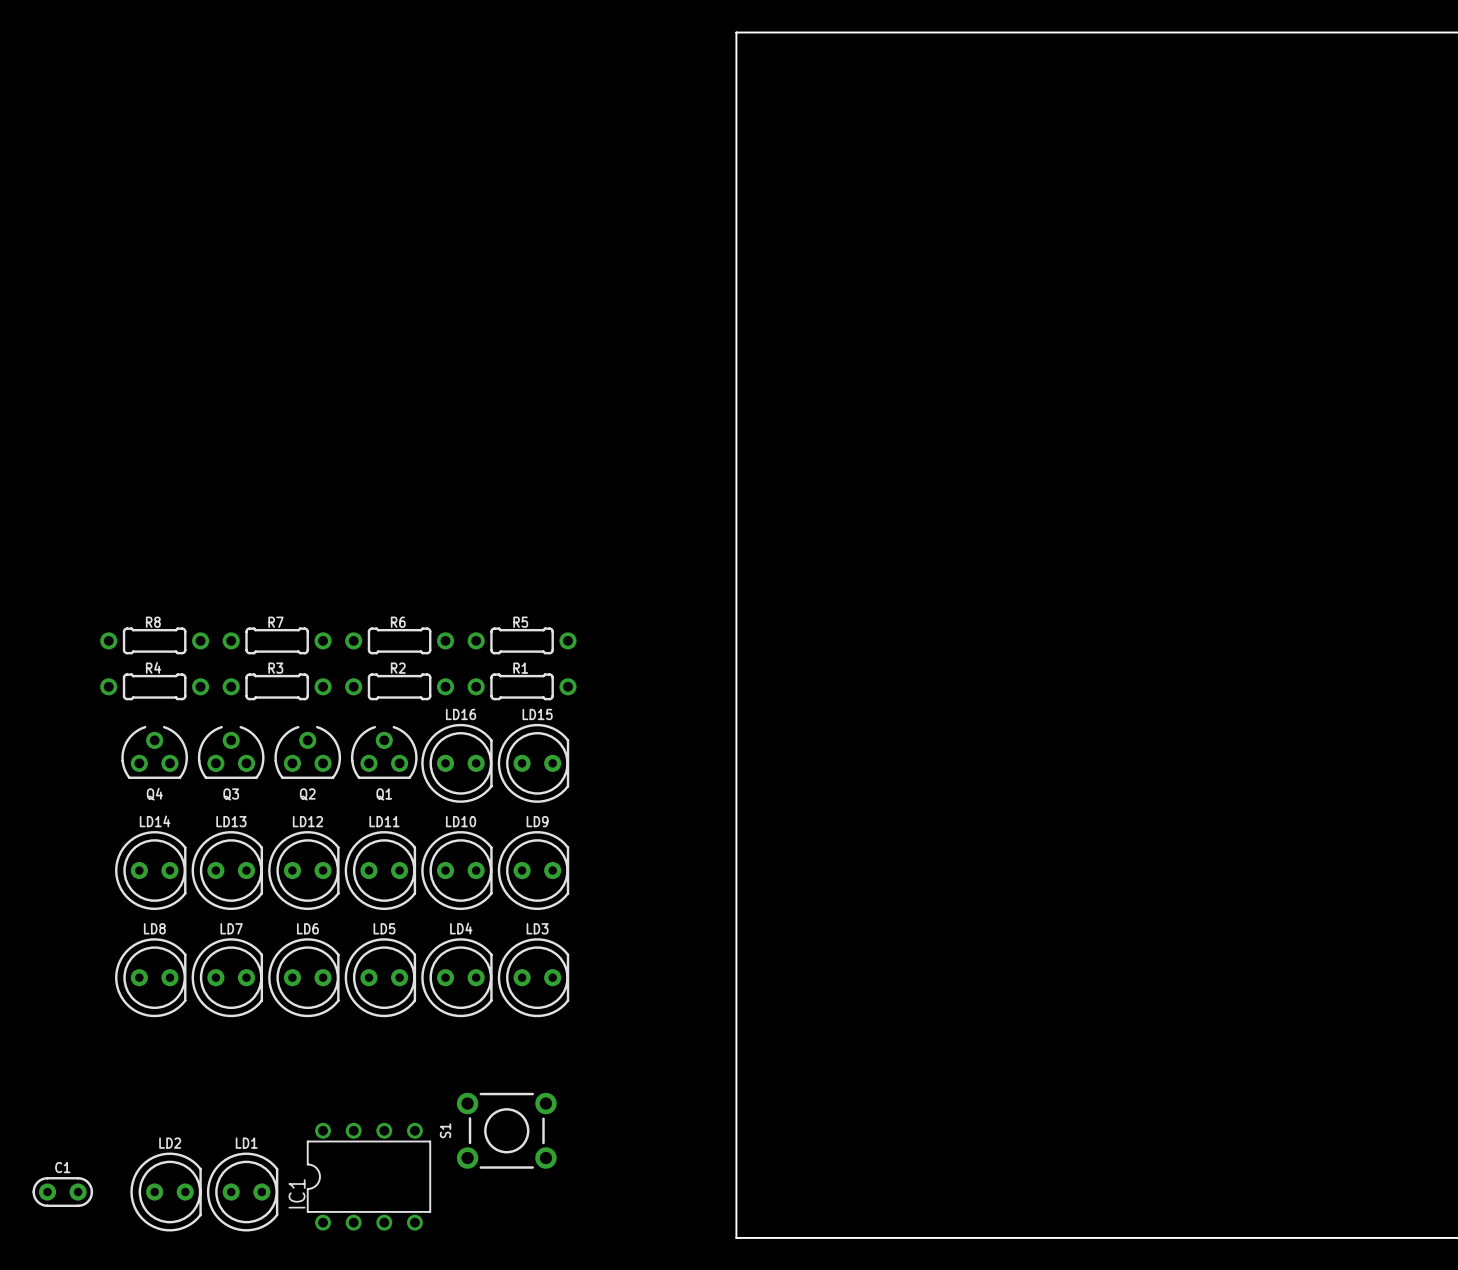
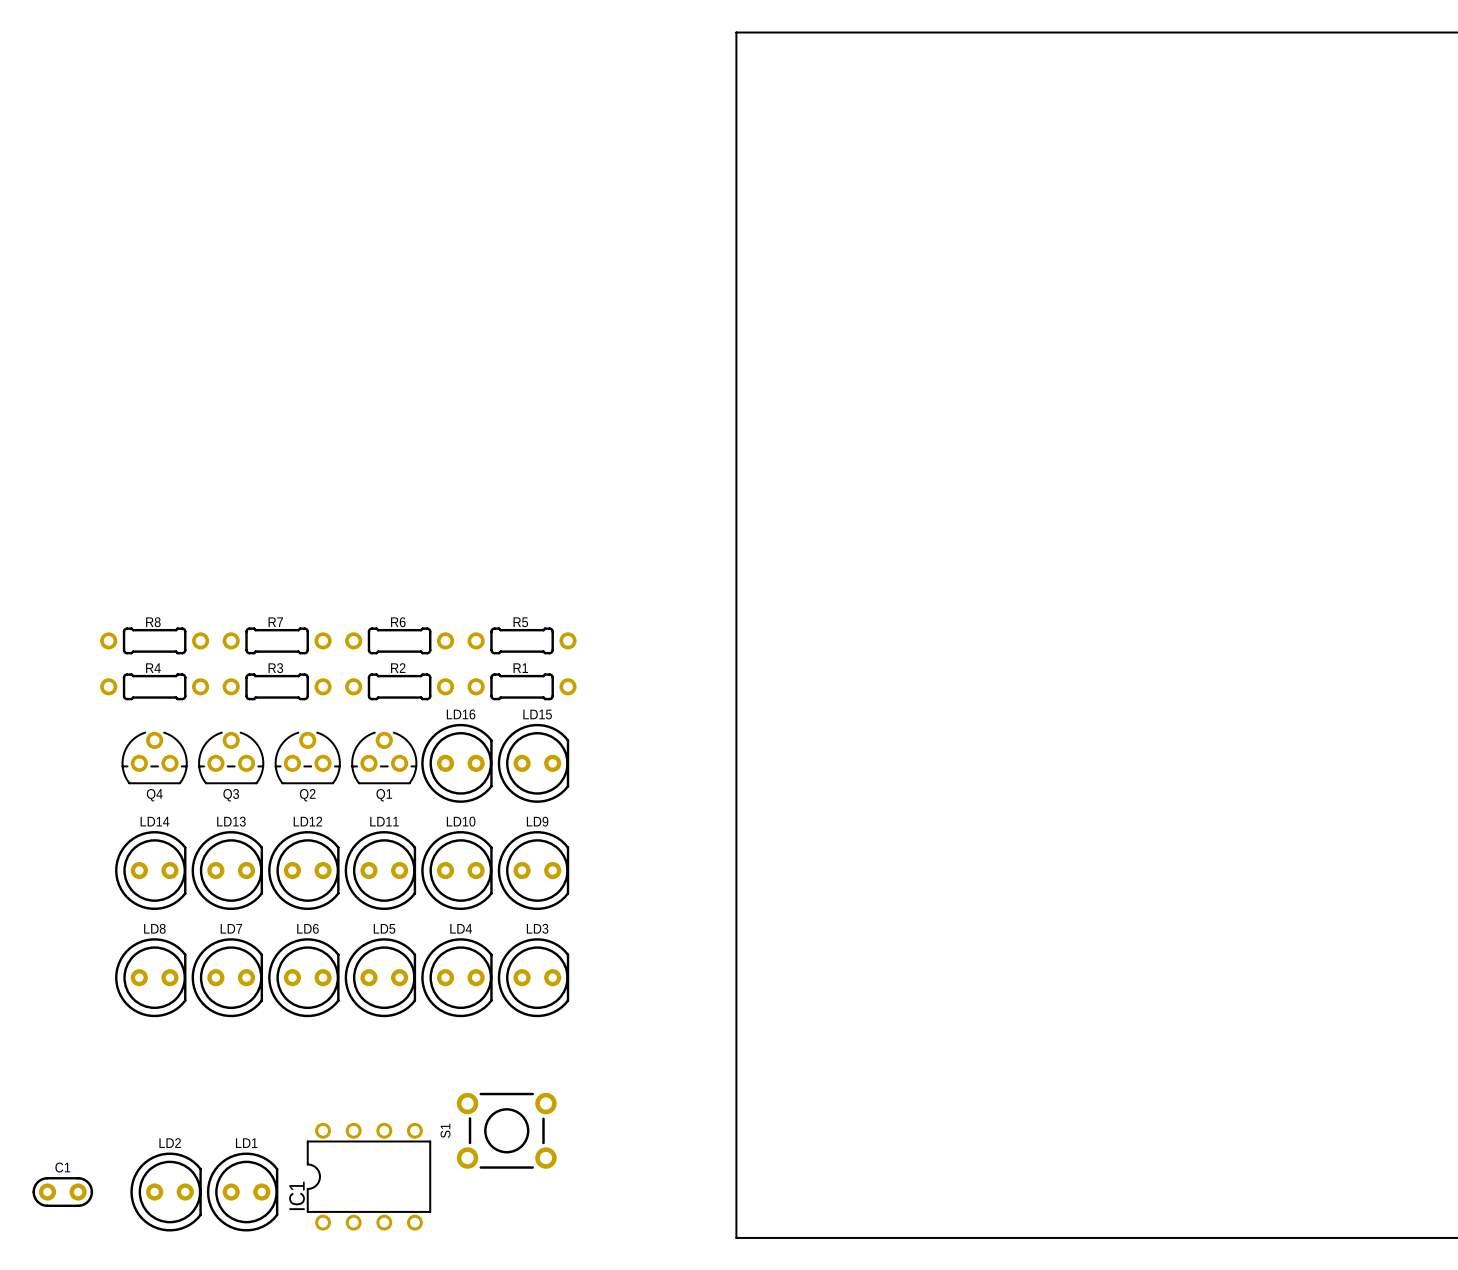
Q4 footprint: [121, 725, 188, 779] -> [121, 731, 188, 785]
Q3 footprint: [197, 725, 265, 779] -> [198, 731, 265, 785]
Q2 footprint: [274, 725, 342, 779] -> [274, 731, 341, 785]
Q1 footprint: [350, 725, 418, 779] -> [351, 731, 418, 785]

